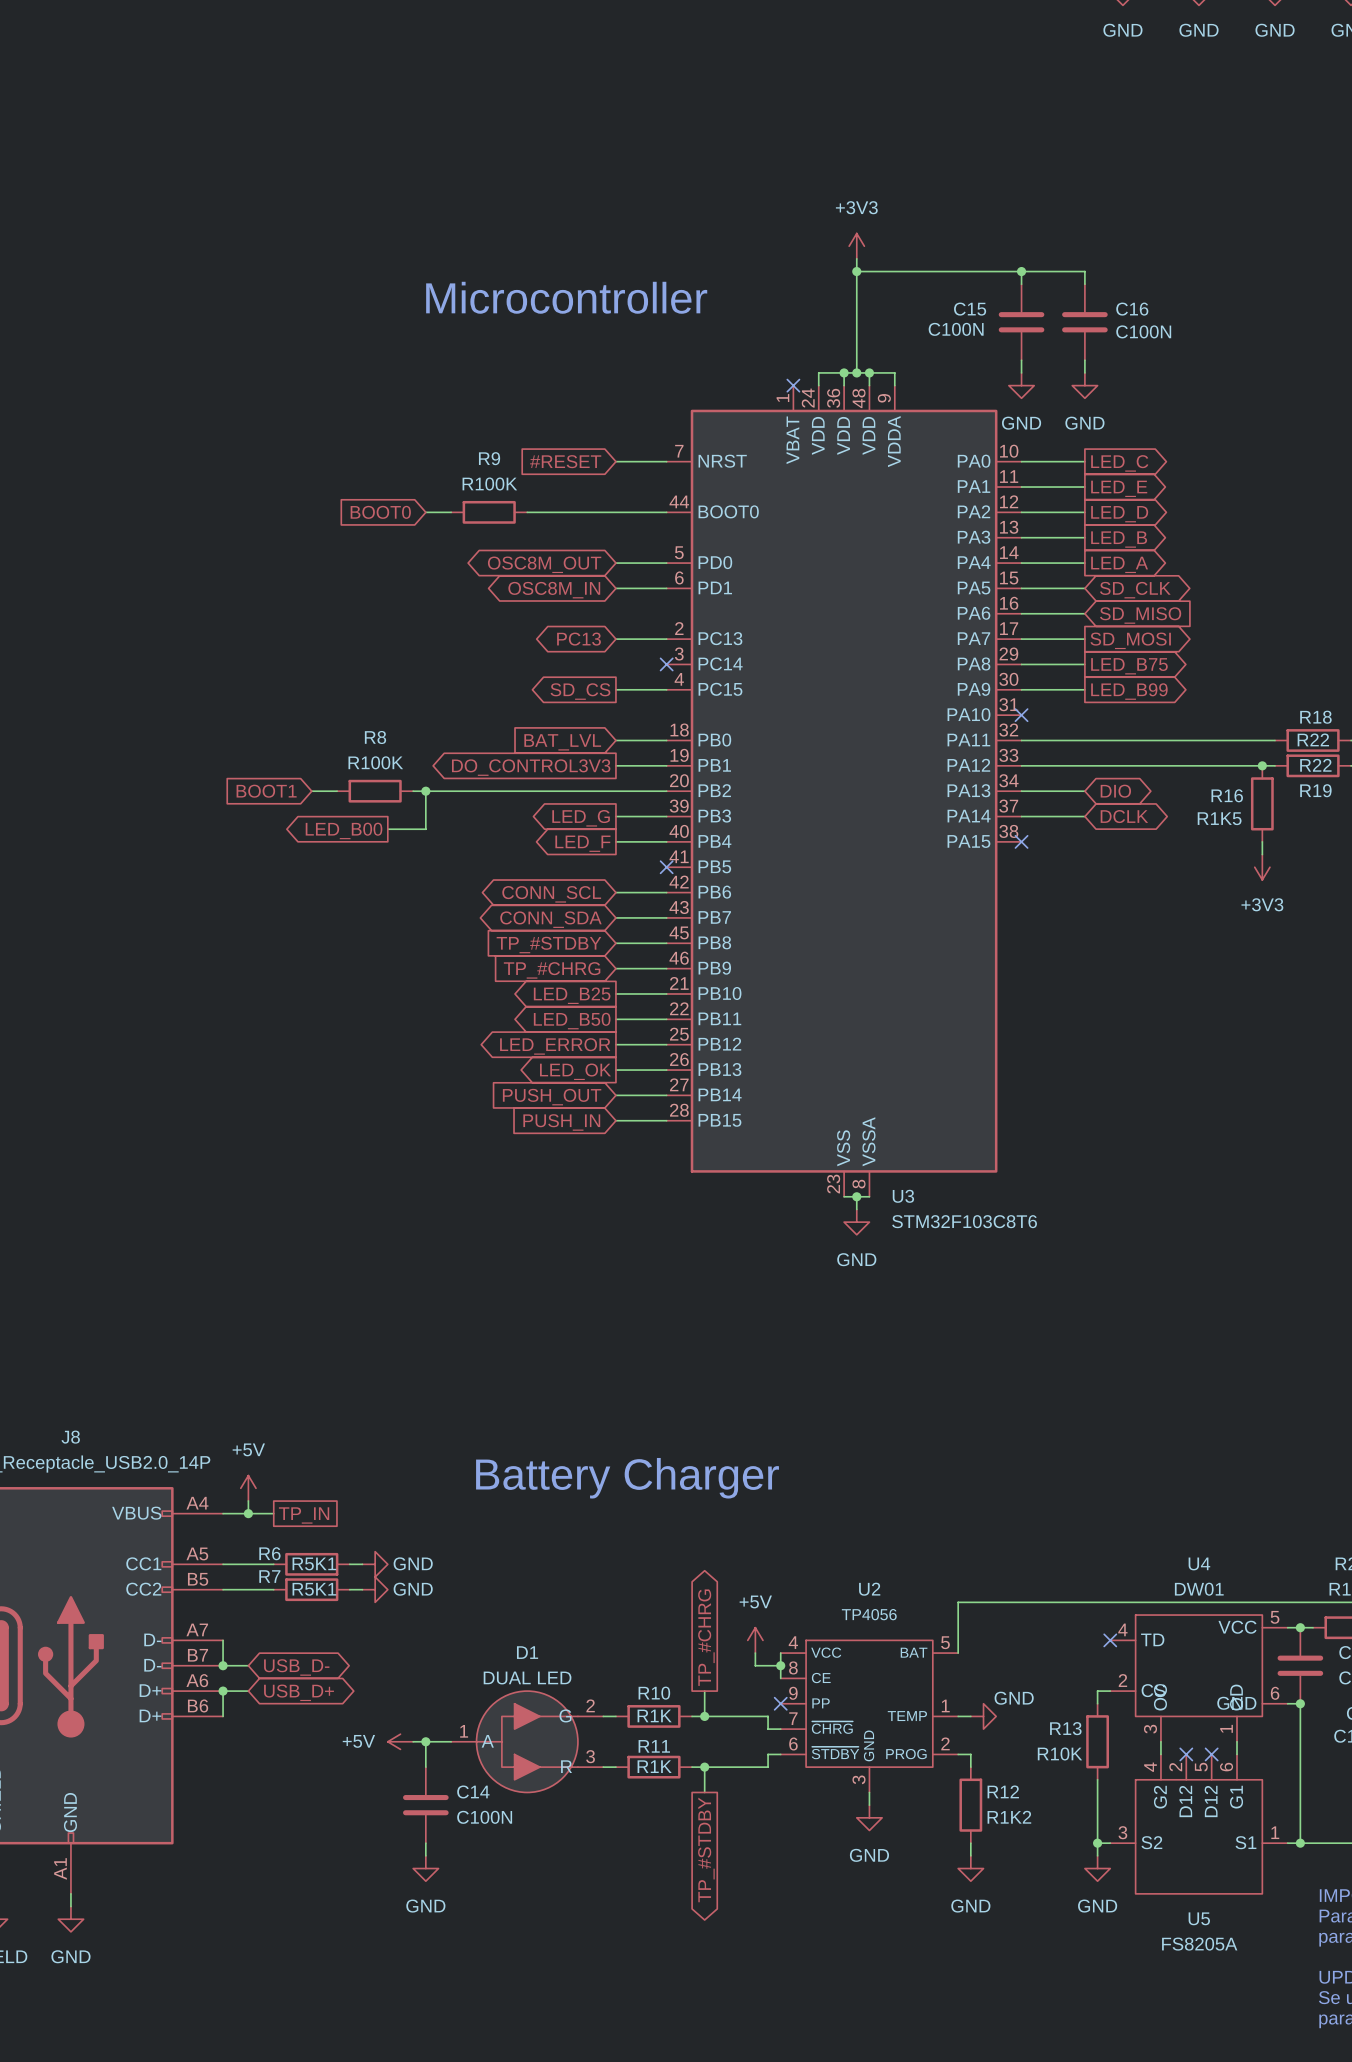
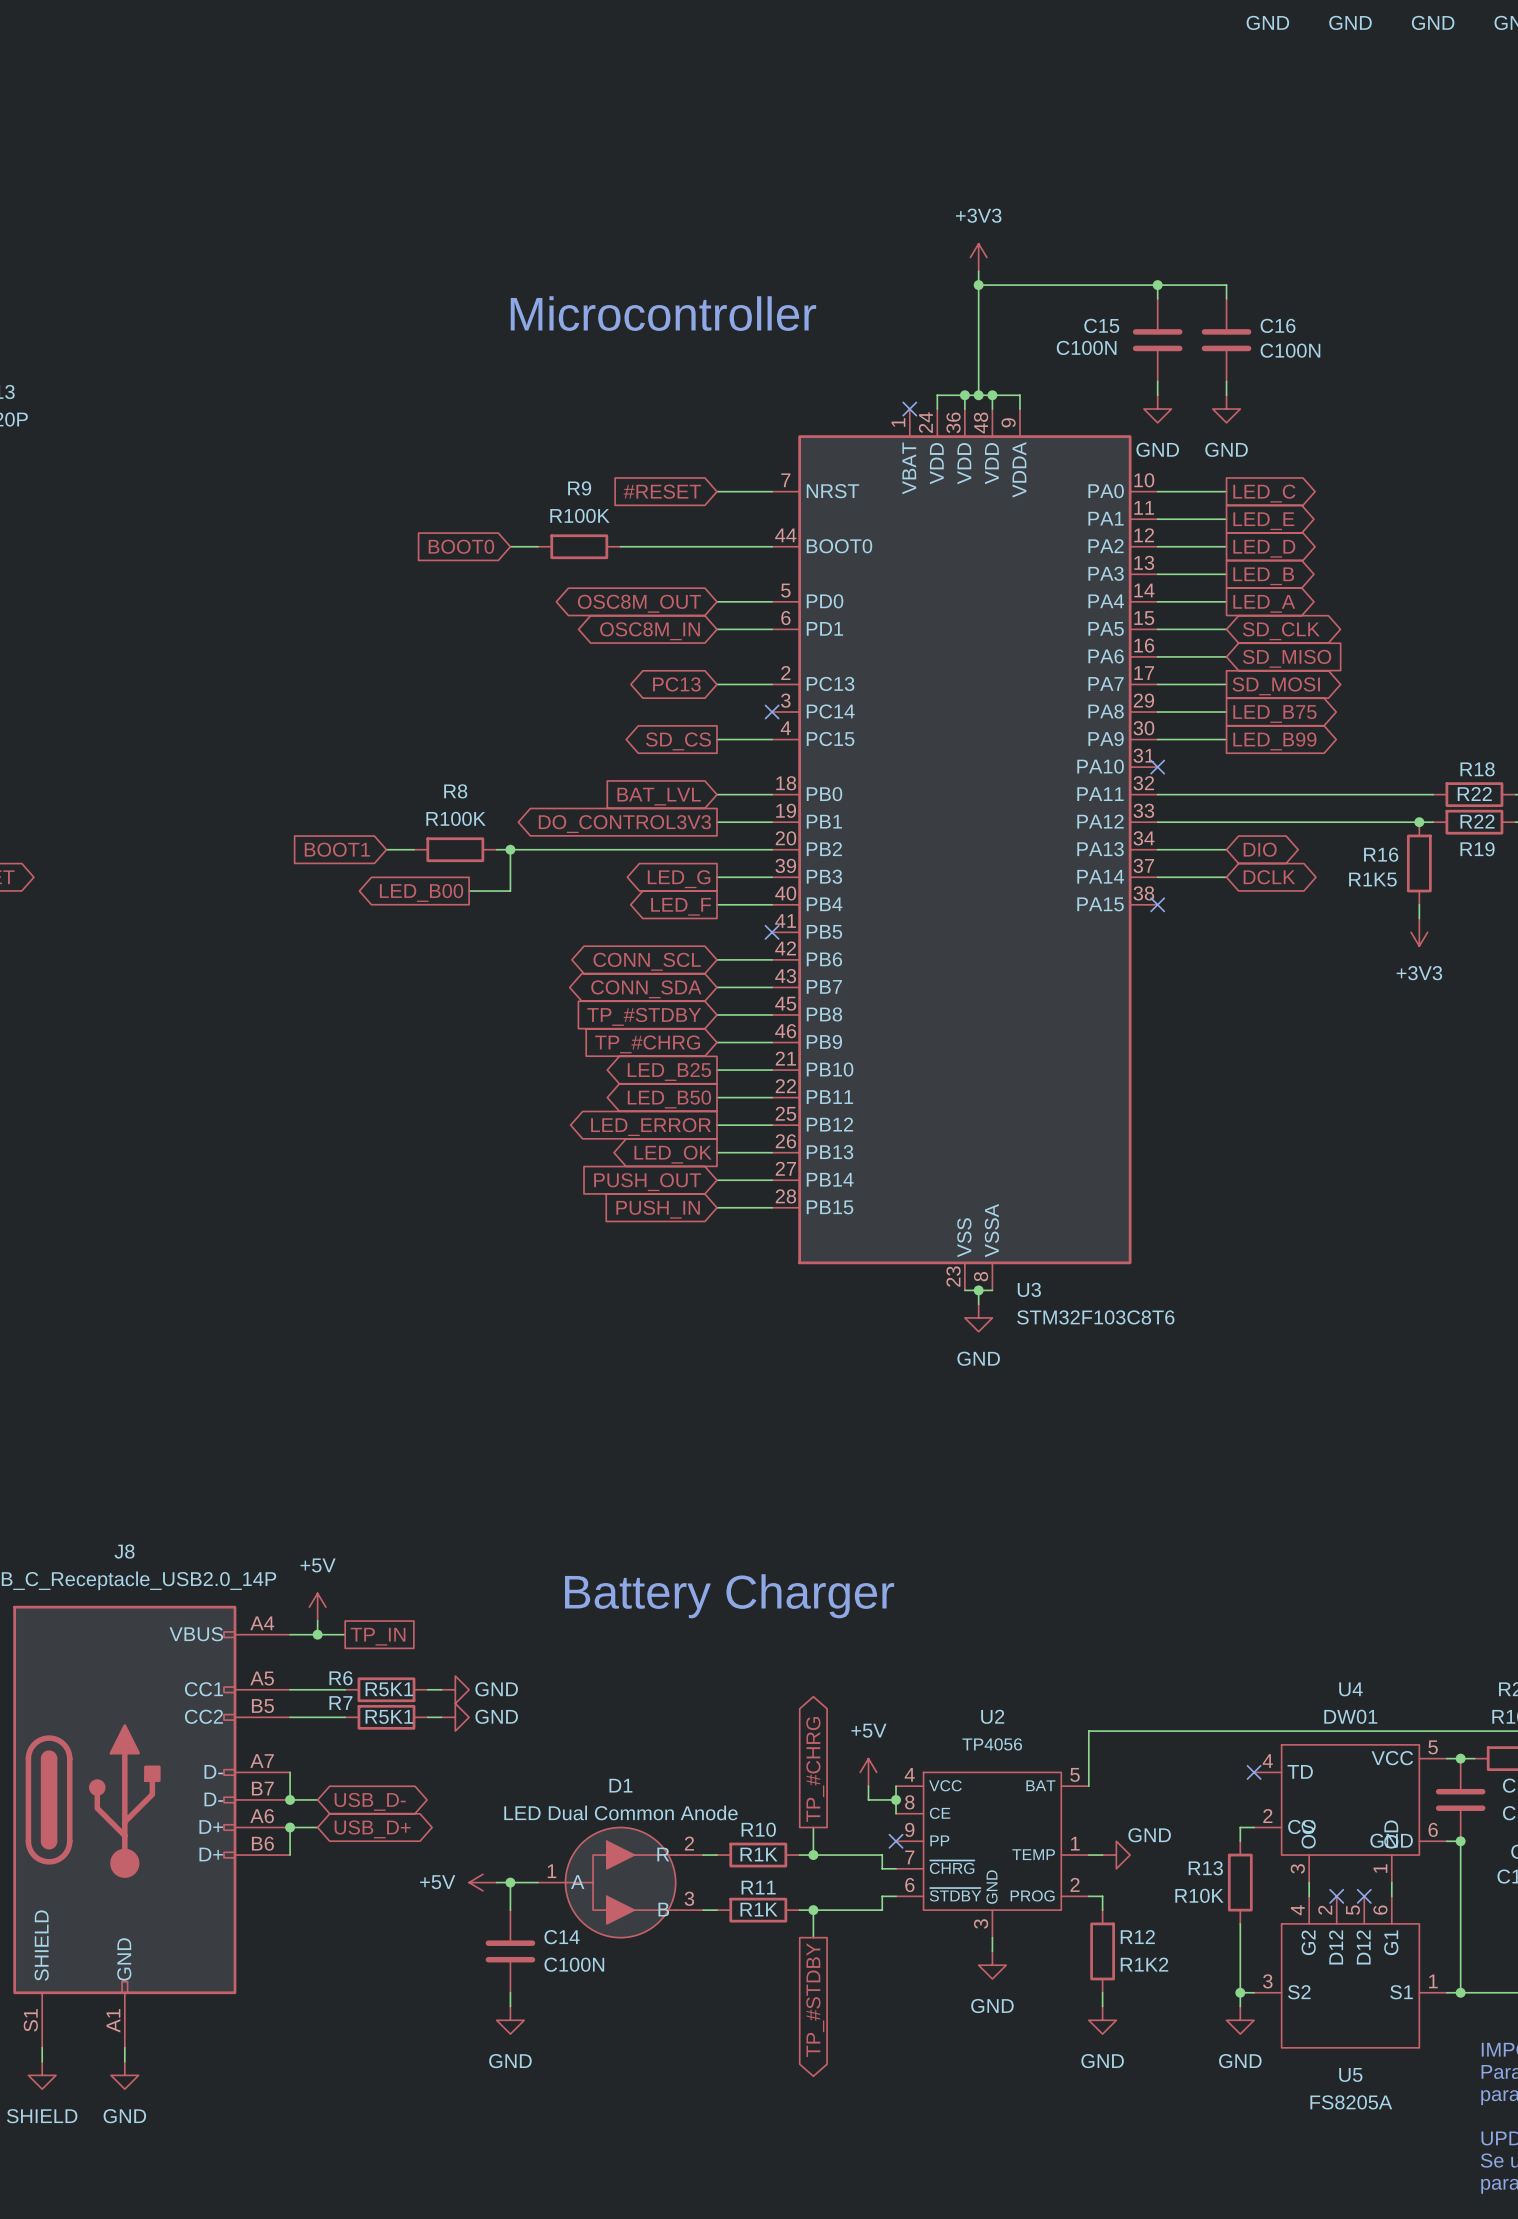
D1 value: DUAL LED (527, 1678) -> LED Dual Common Anode (620, 1812)
D1 pin name: G (565, 1715) -> R (663, 1854)
D1 pin name: R (566, 1766) -> B (663, 1909)

